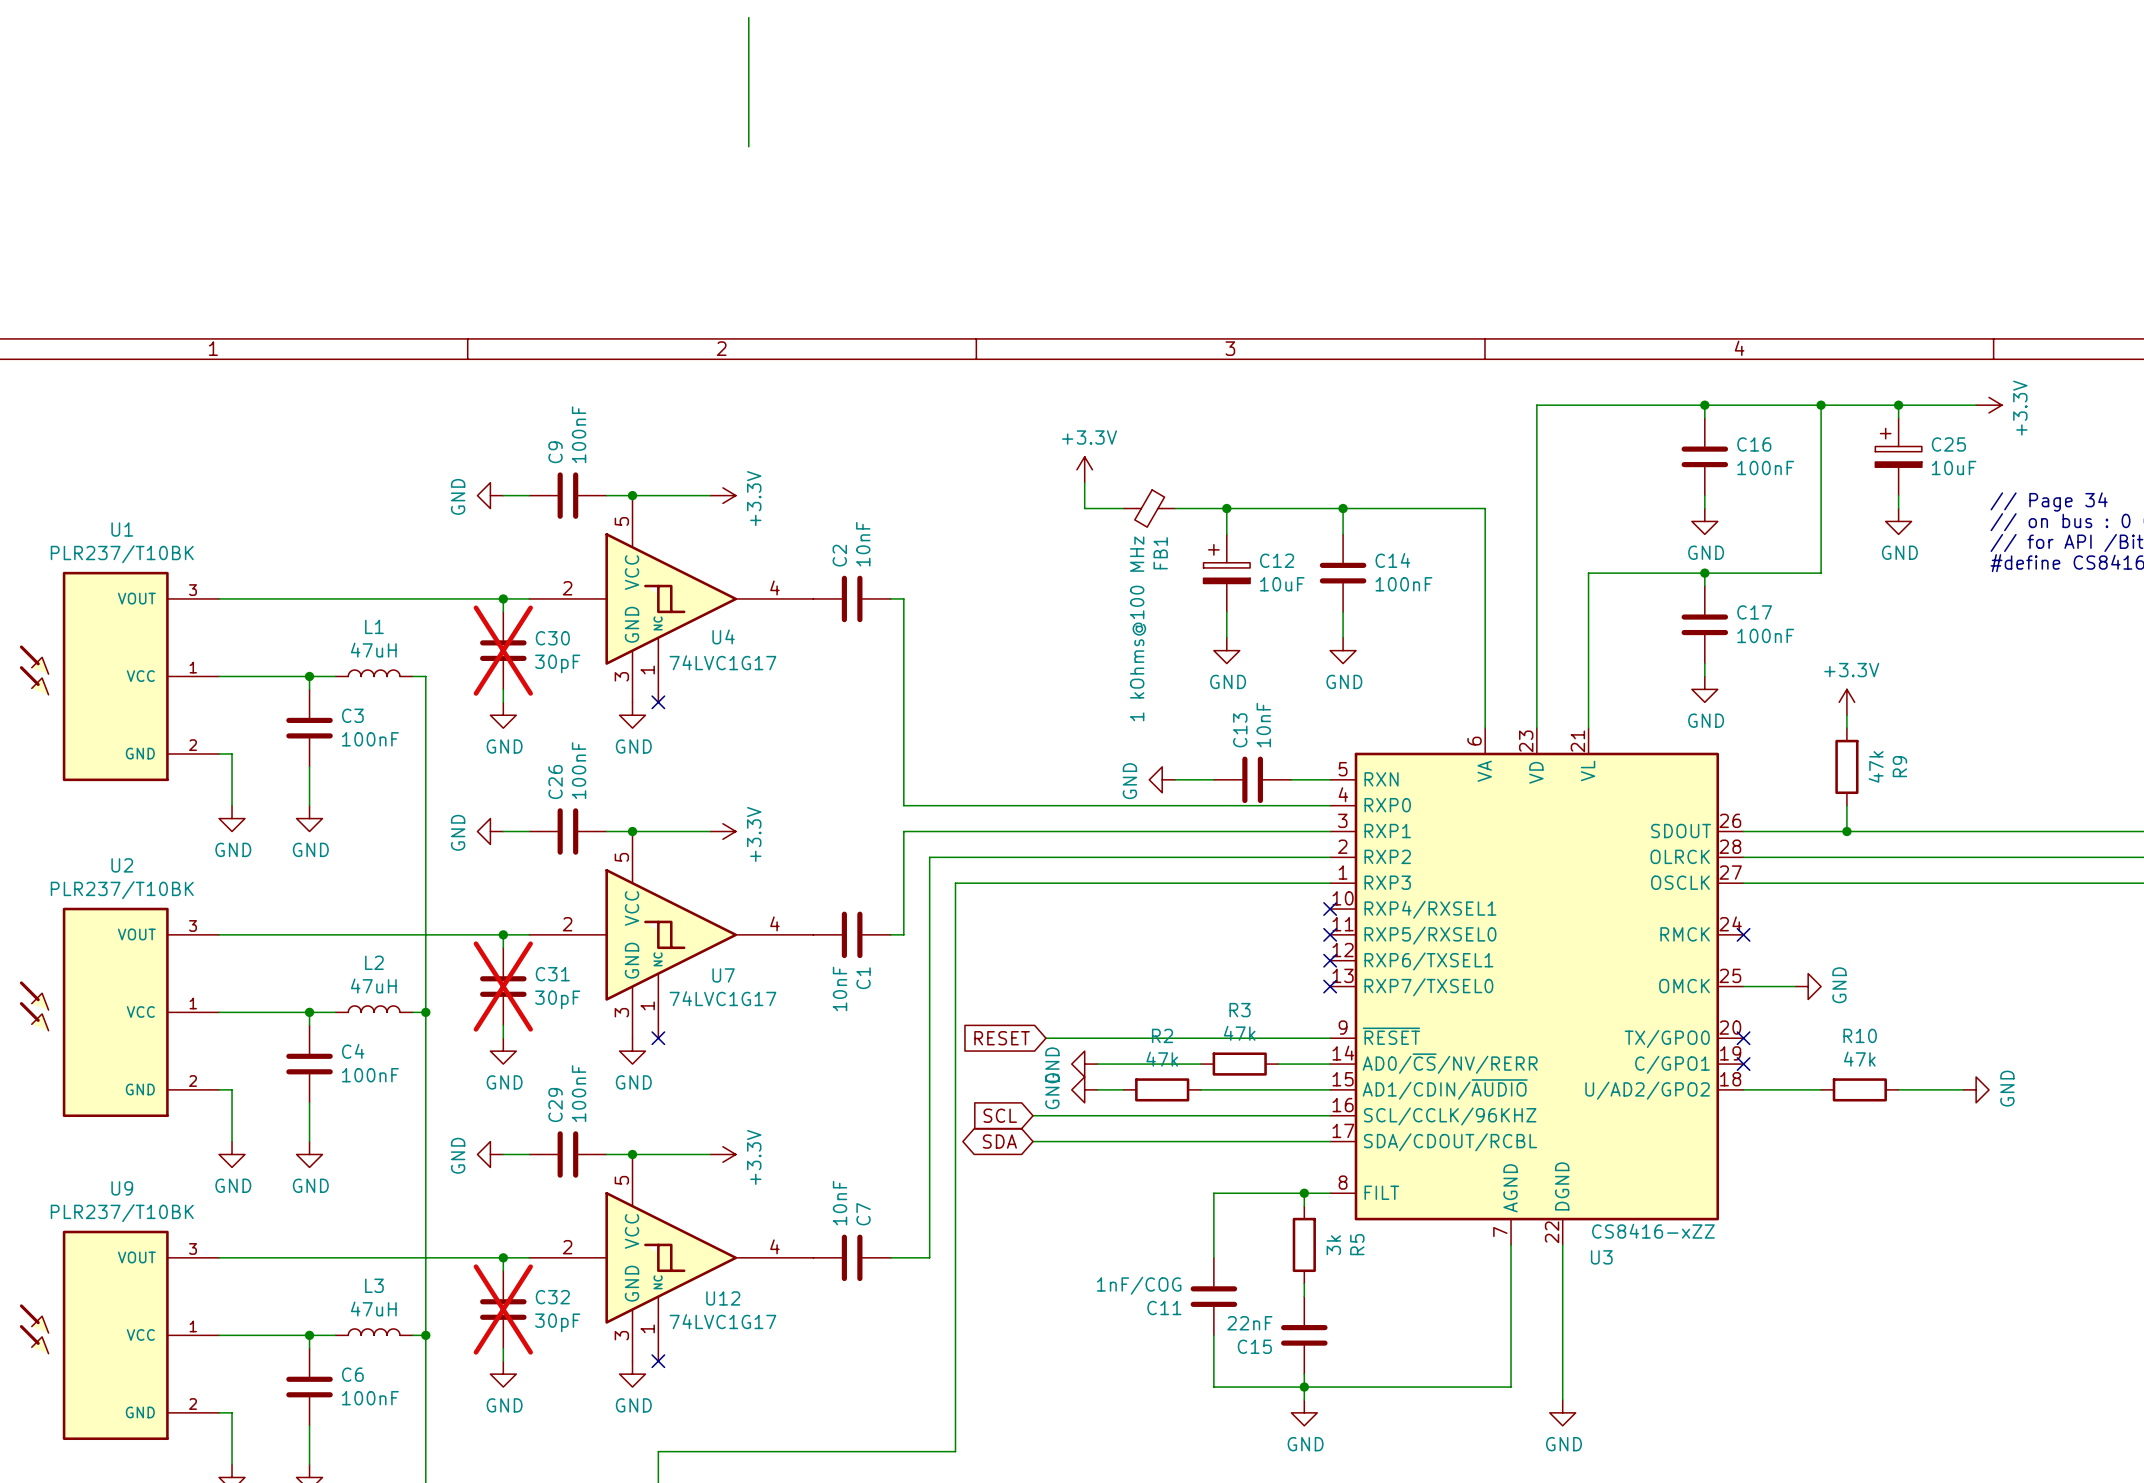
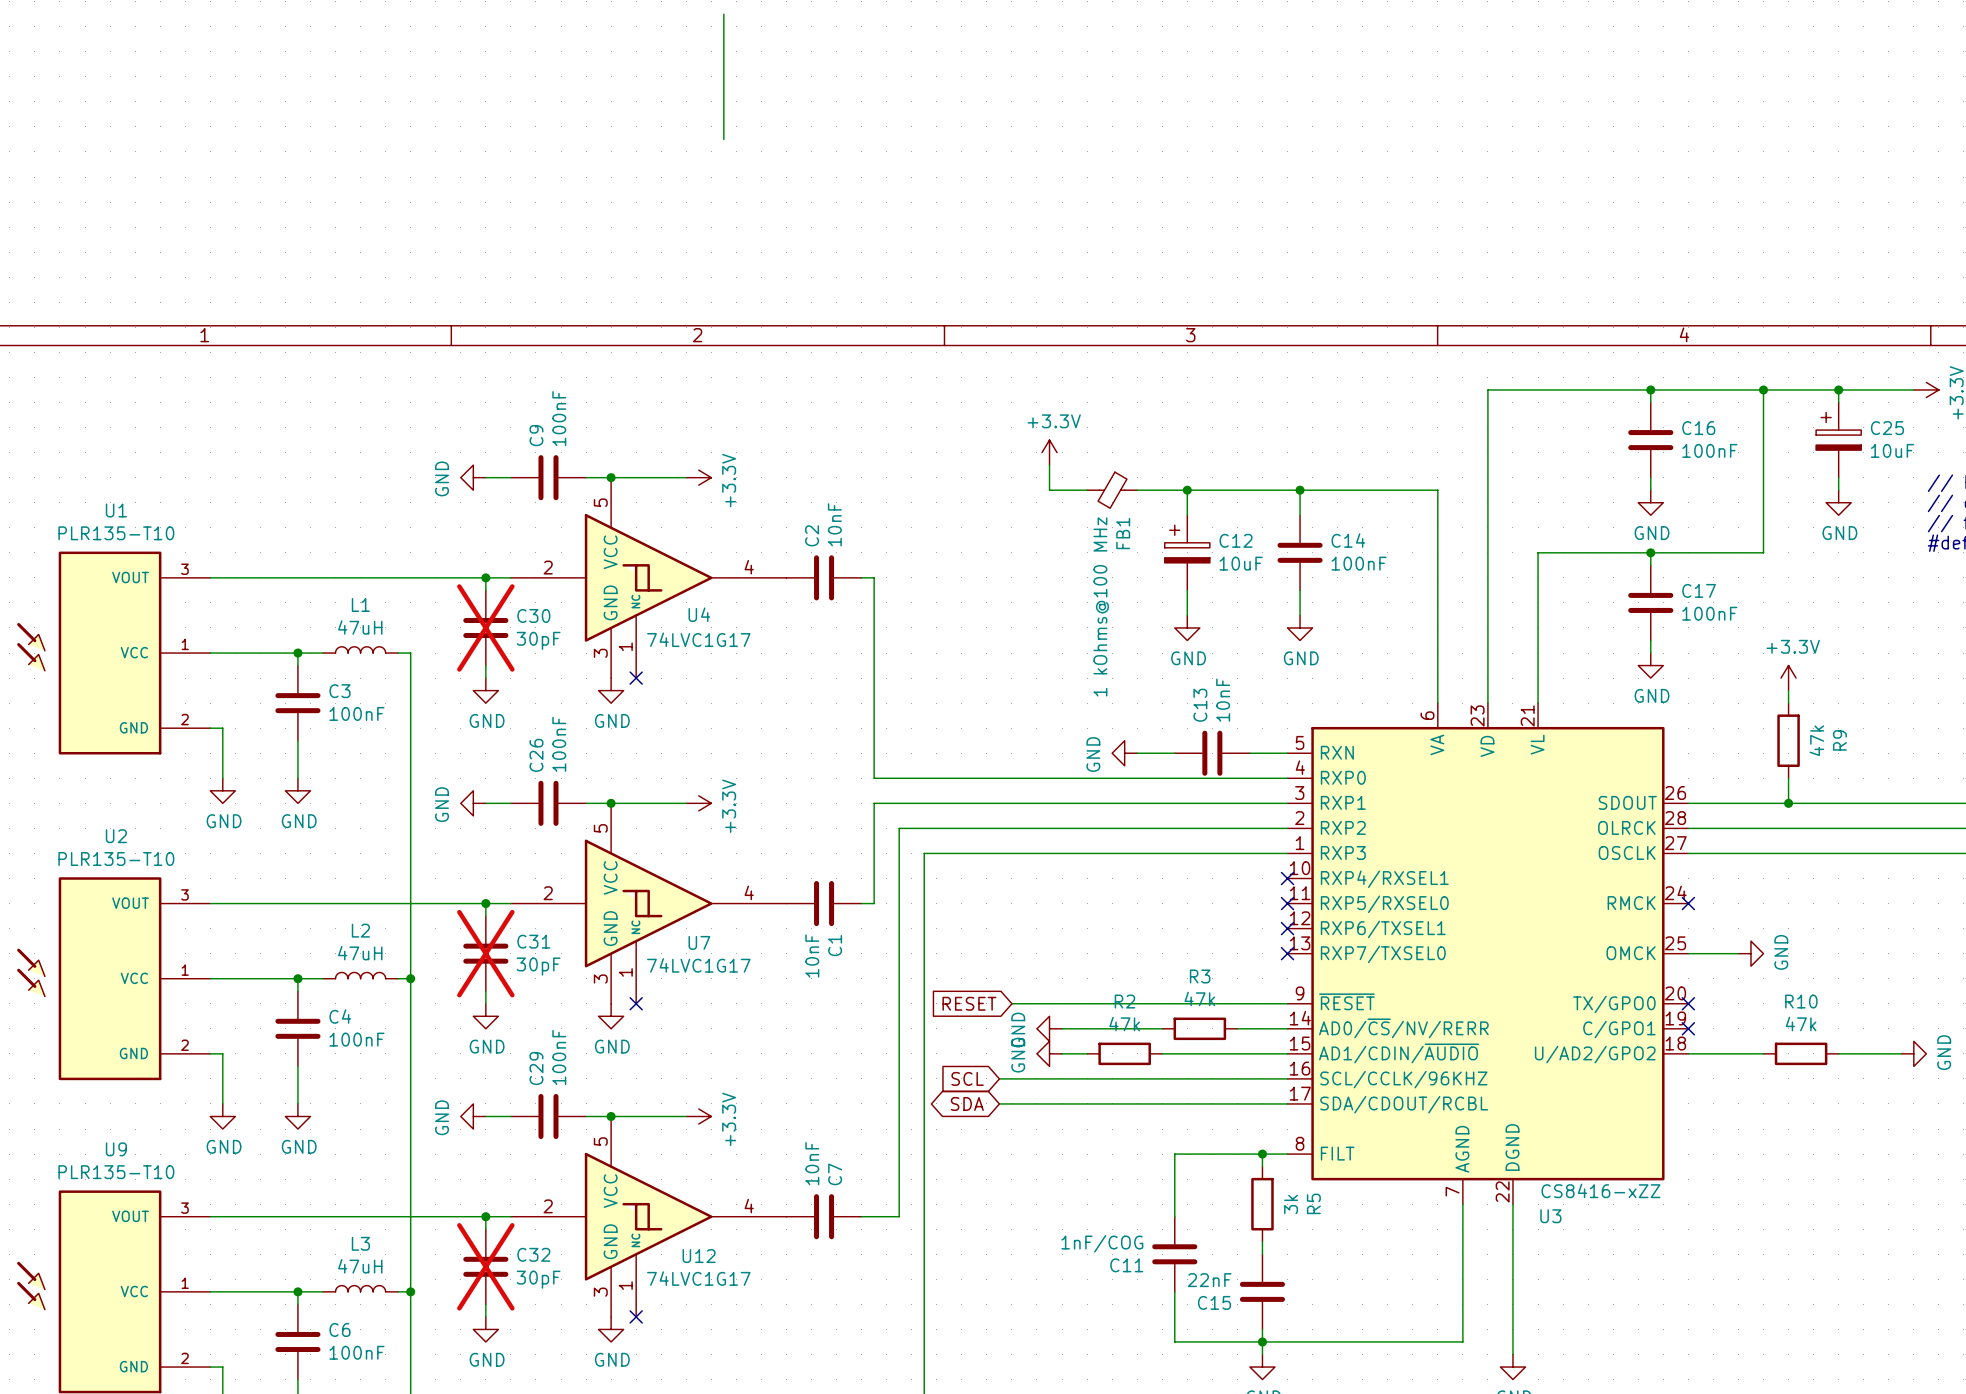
U1 value: PLR237/T10BK (122, 554) -> PLR135-T10 (116, 533)
U2 value: PLR237/T10BK (122, 890) -> PLR135-T10 (116, 858)
U9 value: PLR237/T10BK (122, 1213) -> PLR135-T10 (116, 1172)

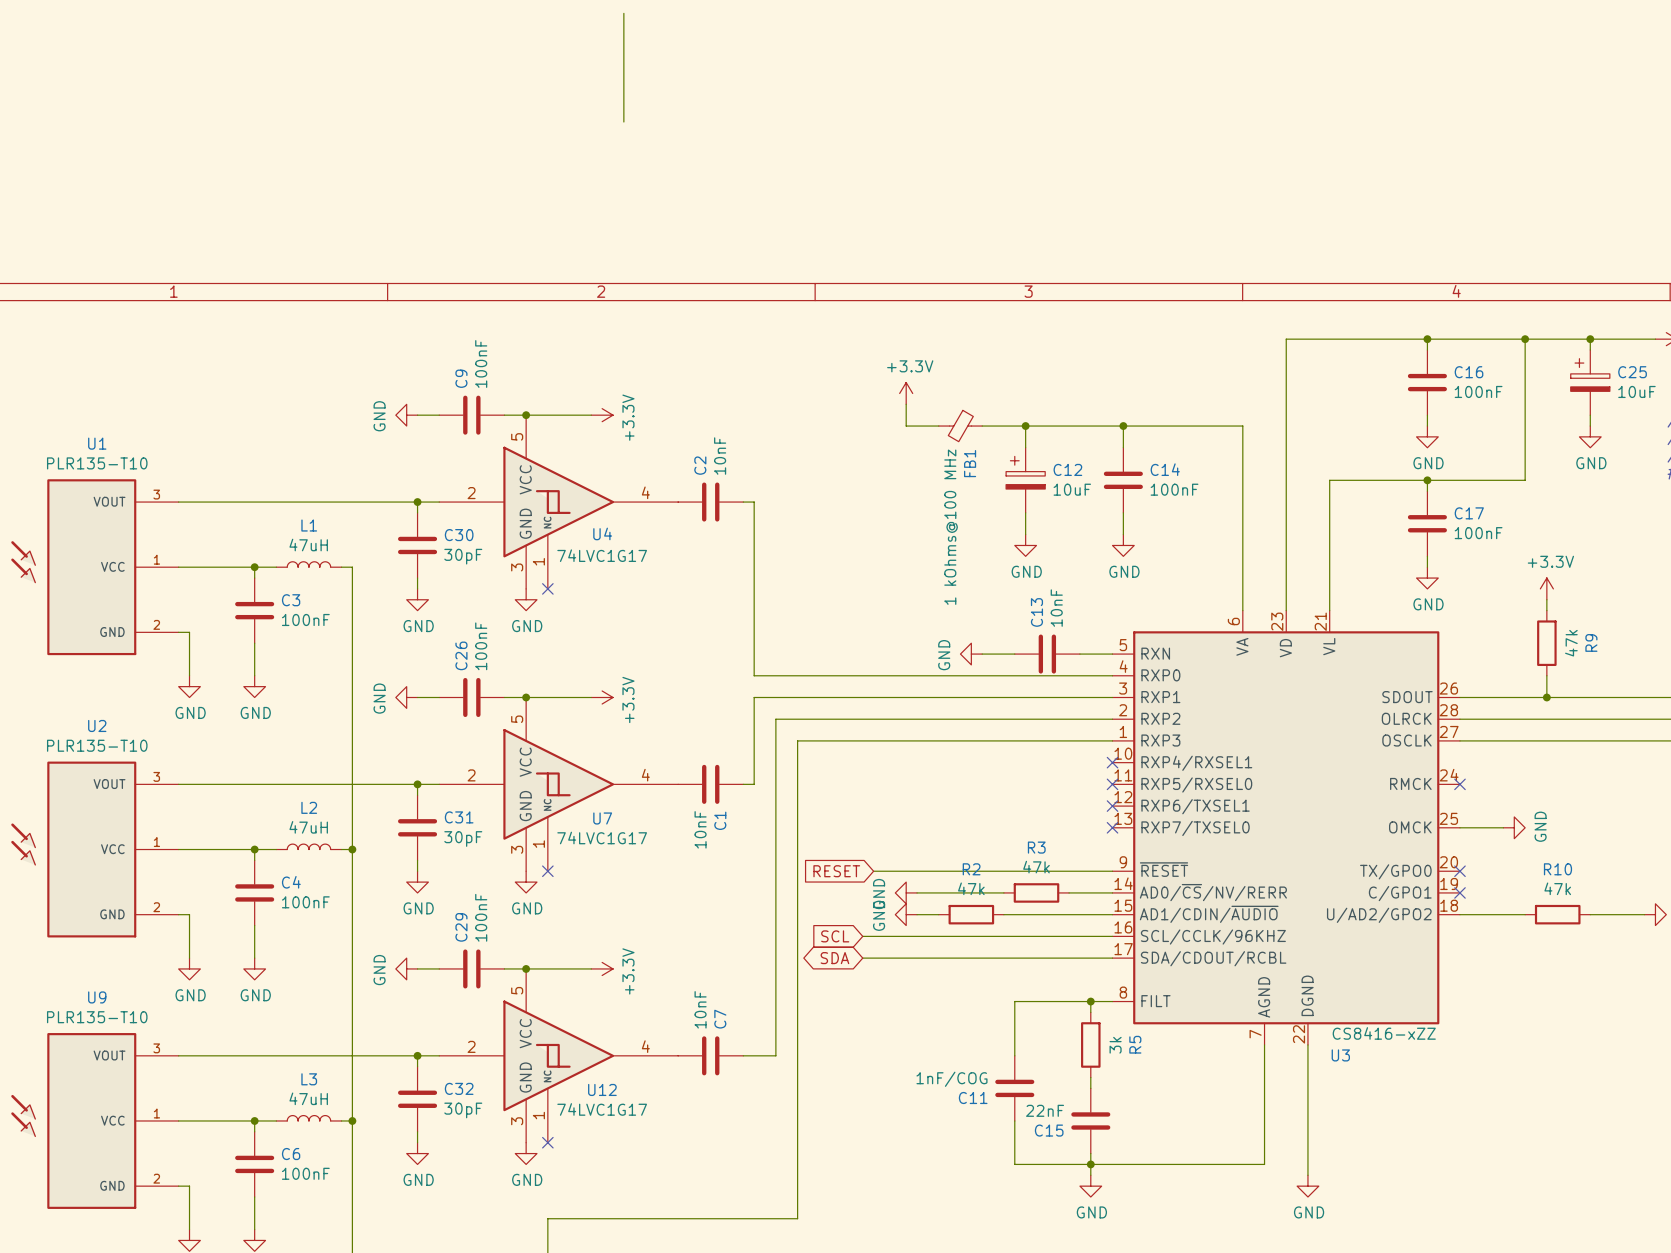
C30 do-not-place cross: (485, 627) -> none
C31 do-not-place cross: (485, 953) -> none
C32 do-not-place cross: (485, 1266) -> none

